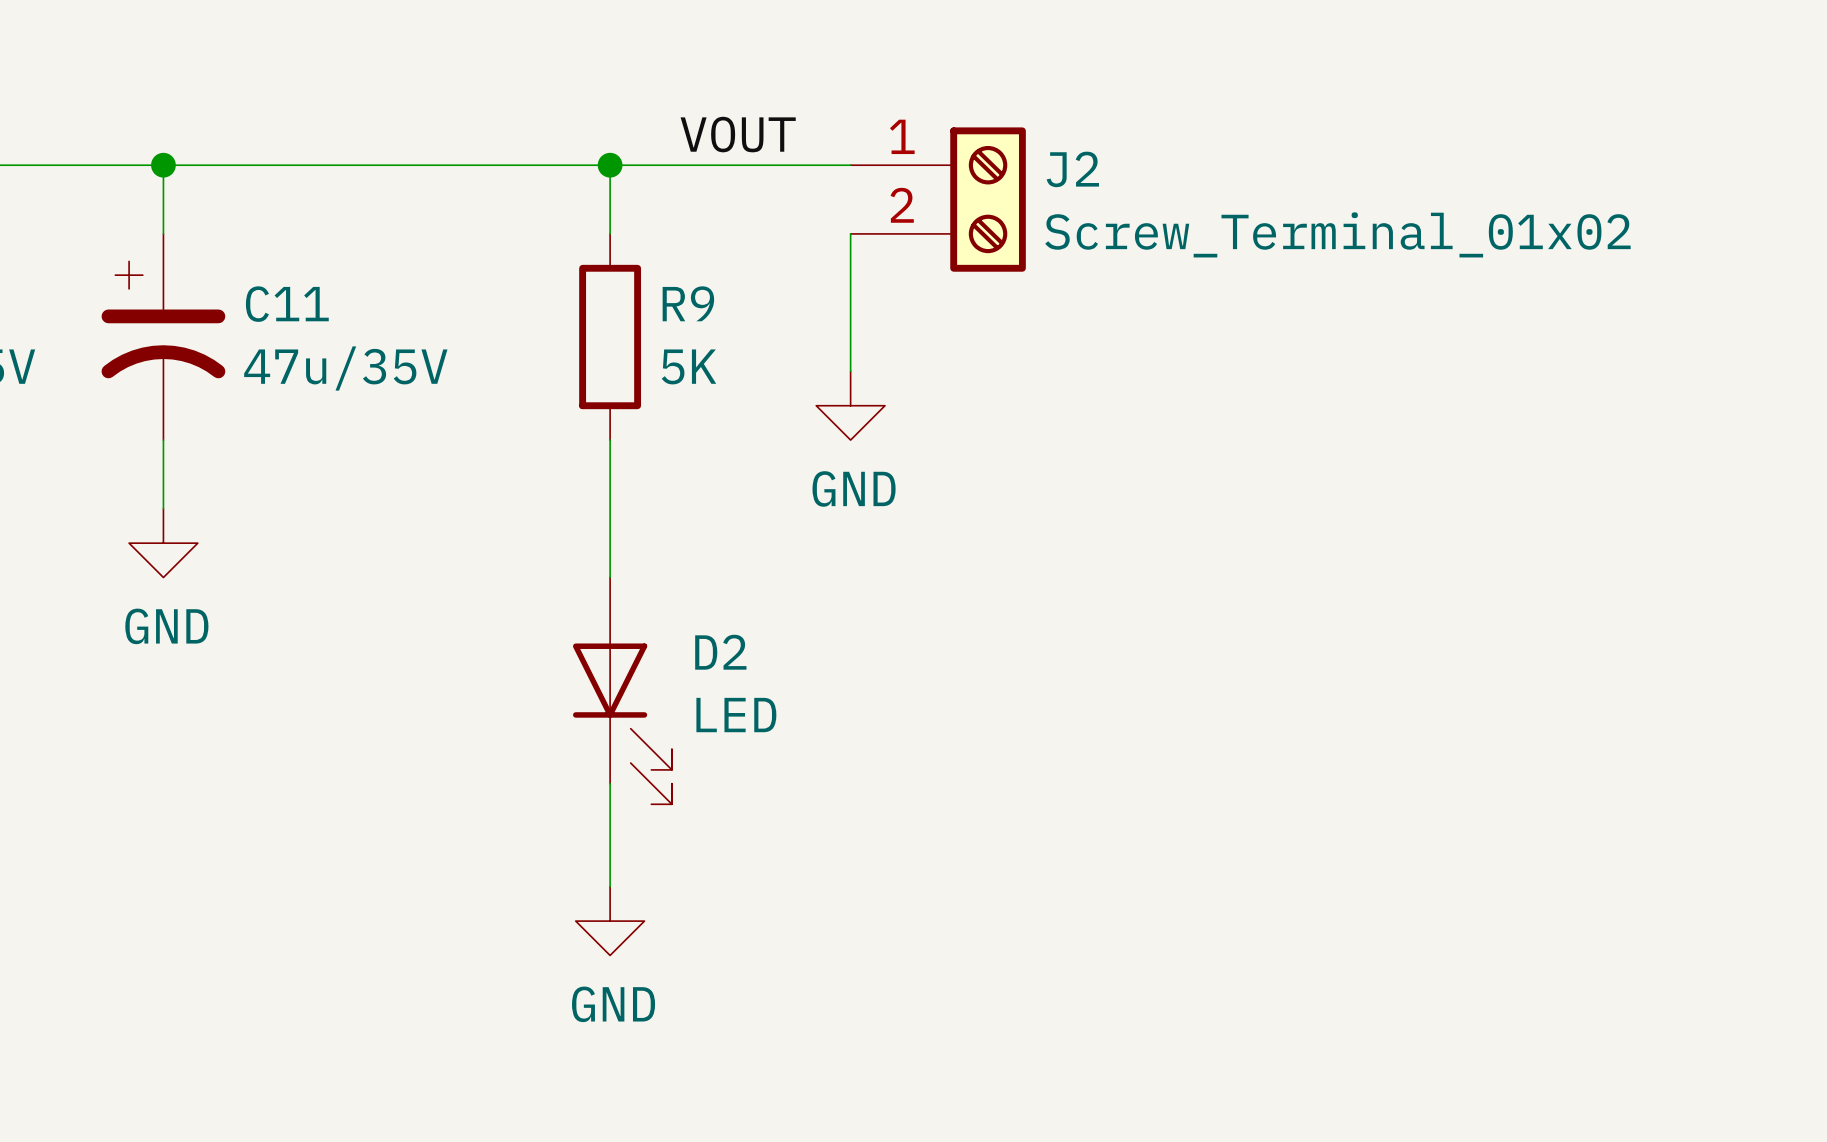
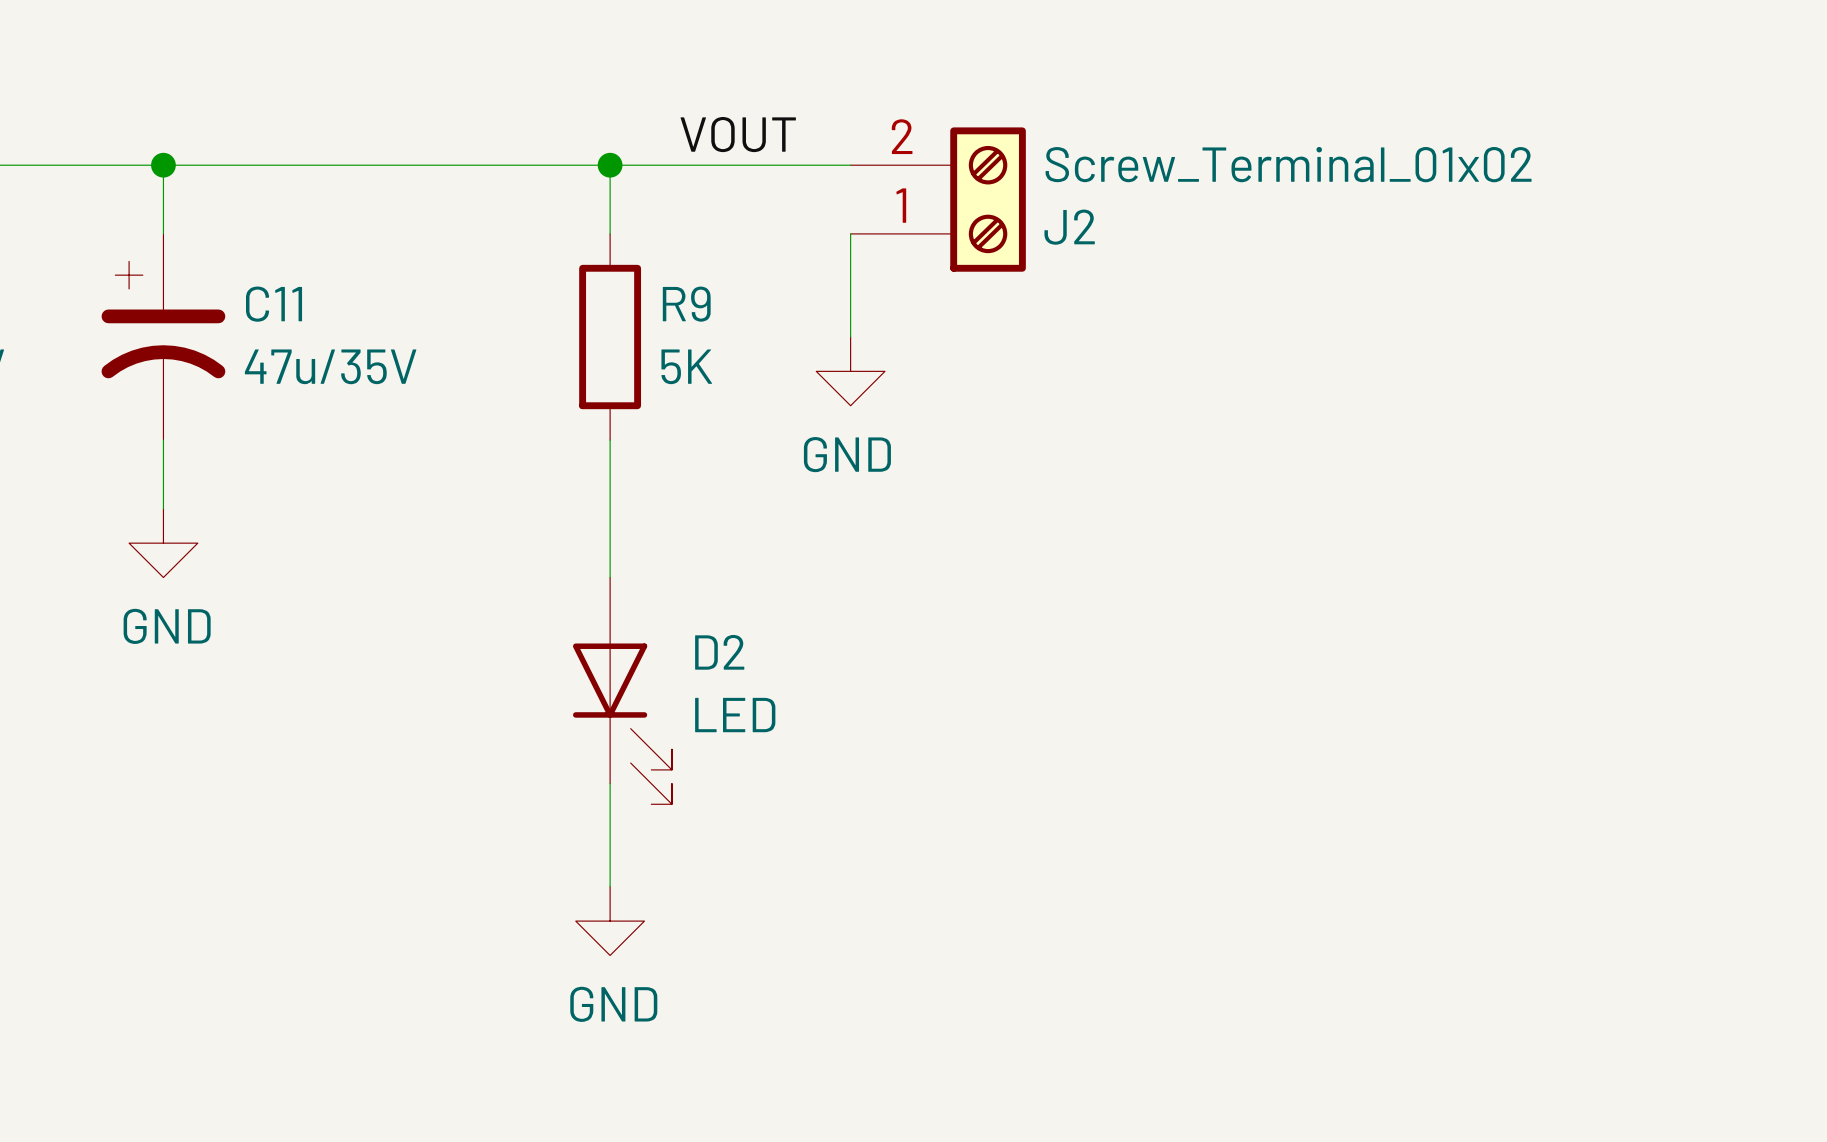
J2 flip: as is (988, 199) -> up-down (988, 199)
power symbol position: GND (850, 405) -> GND (850, 371)
power symbol text position: GND (854, 488) -> GND (847, 454)

